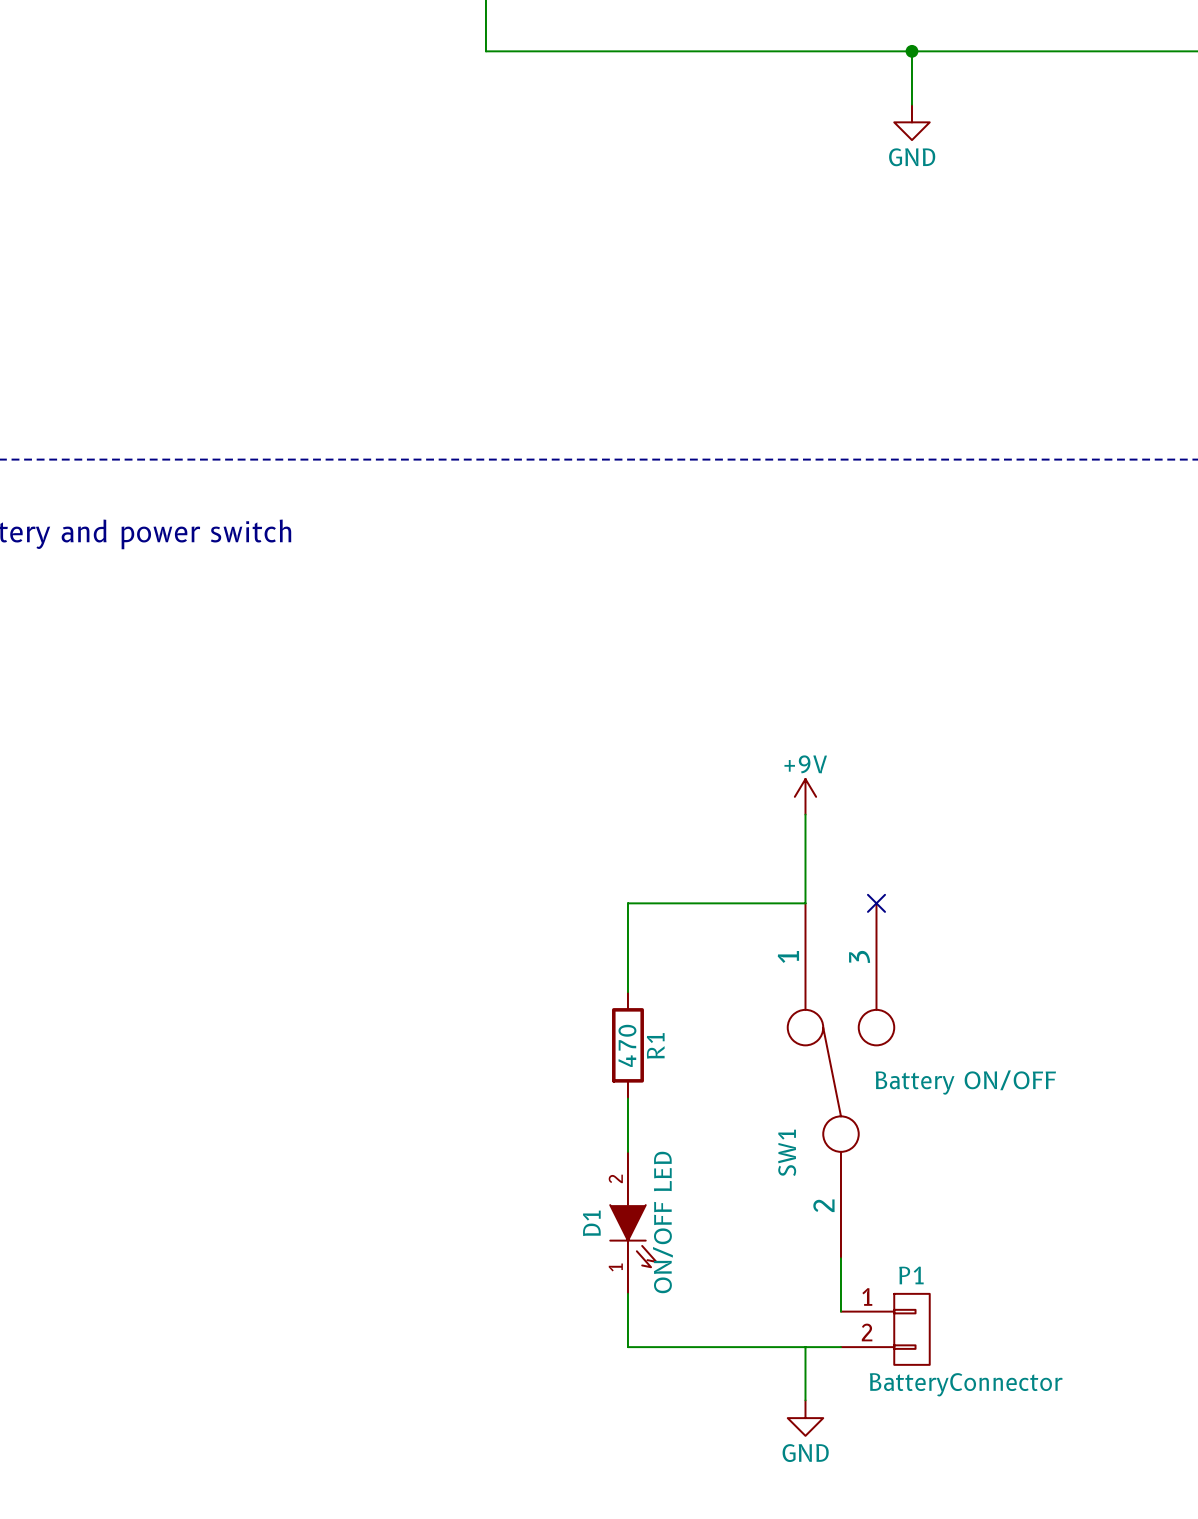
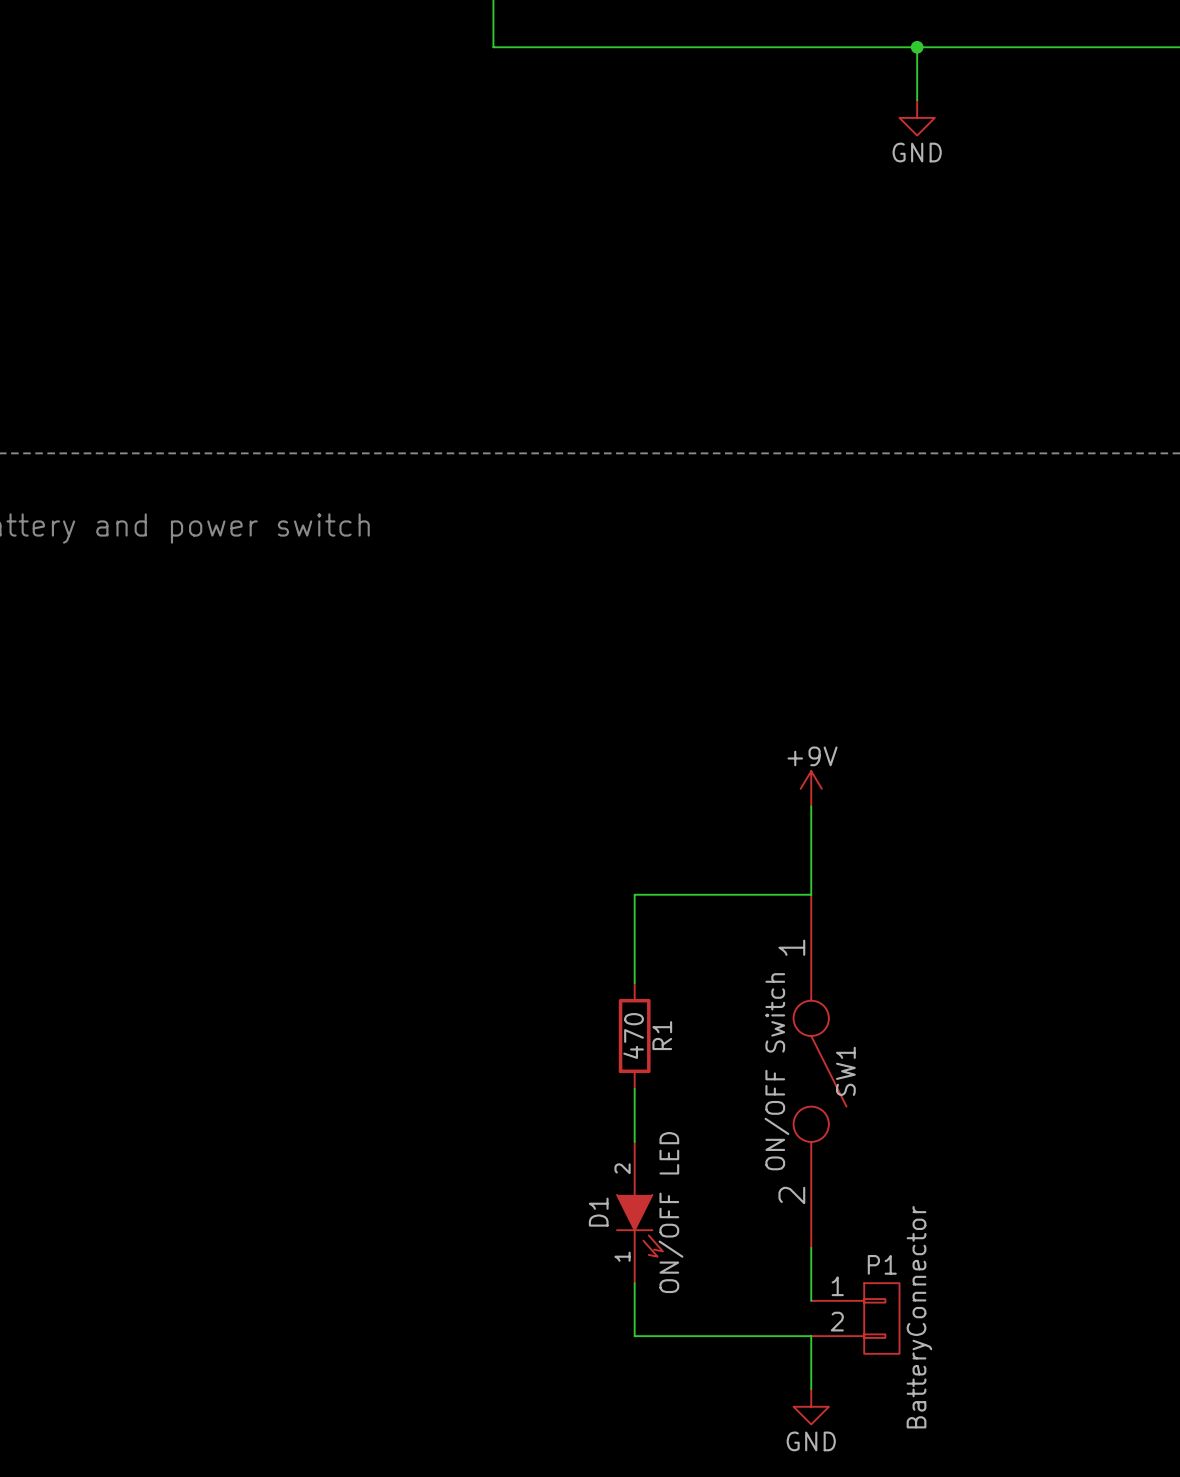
SW1 symbol: [787, 903, 895, 1259] -> [793, 894, 847, 1248]
no-connect mark: (876, 903) -> none
SW1 value: Battery ON/OFF (965, 1082) -> ON/OFF Switch (776, 1071)
SW1 name position: SW1 (787, 1152) -> SW1 (845, 1071)
wire: (840, 1258) (840, 1311) -> (811, 1247) (811, 1300)
P1 position: (885, 1329) -> (855, 1318)
P1 value rotation: 0° (966, 1384) -> 90° counterclockwise (919, 1317)

